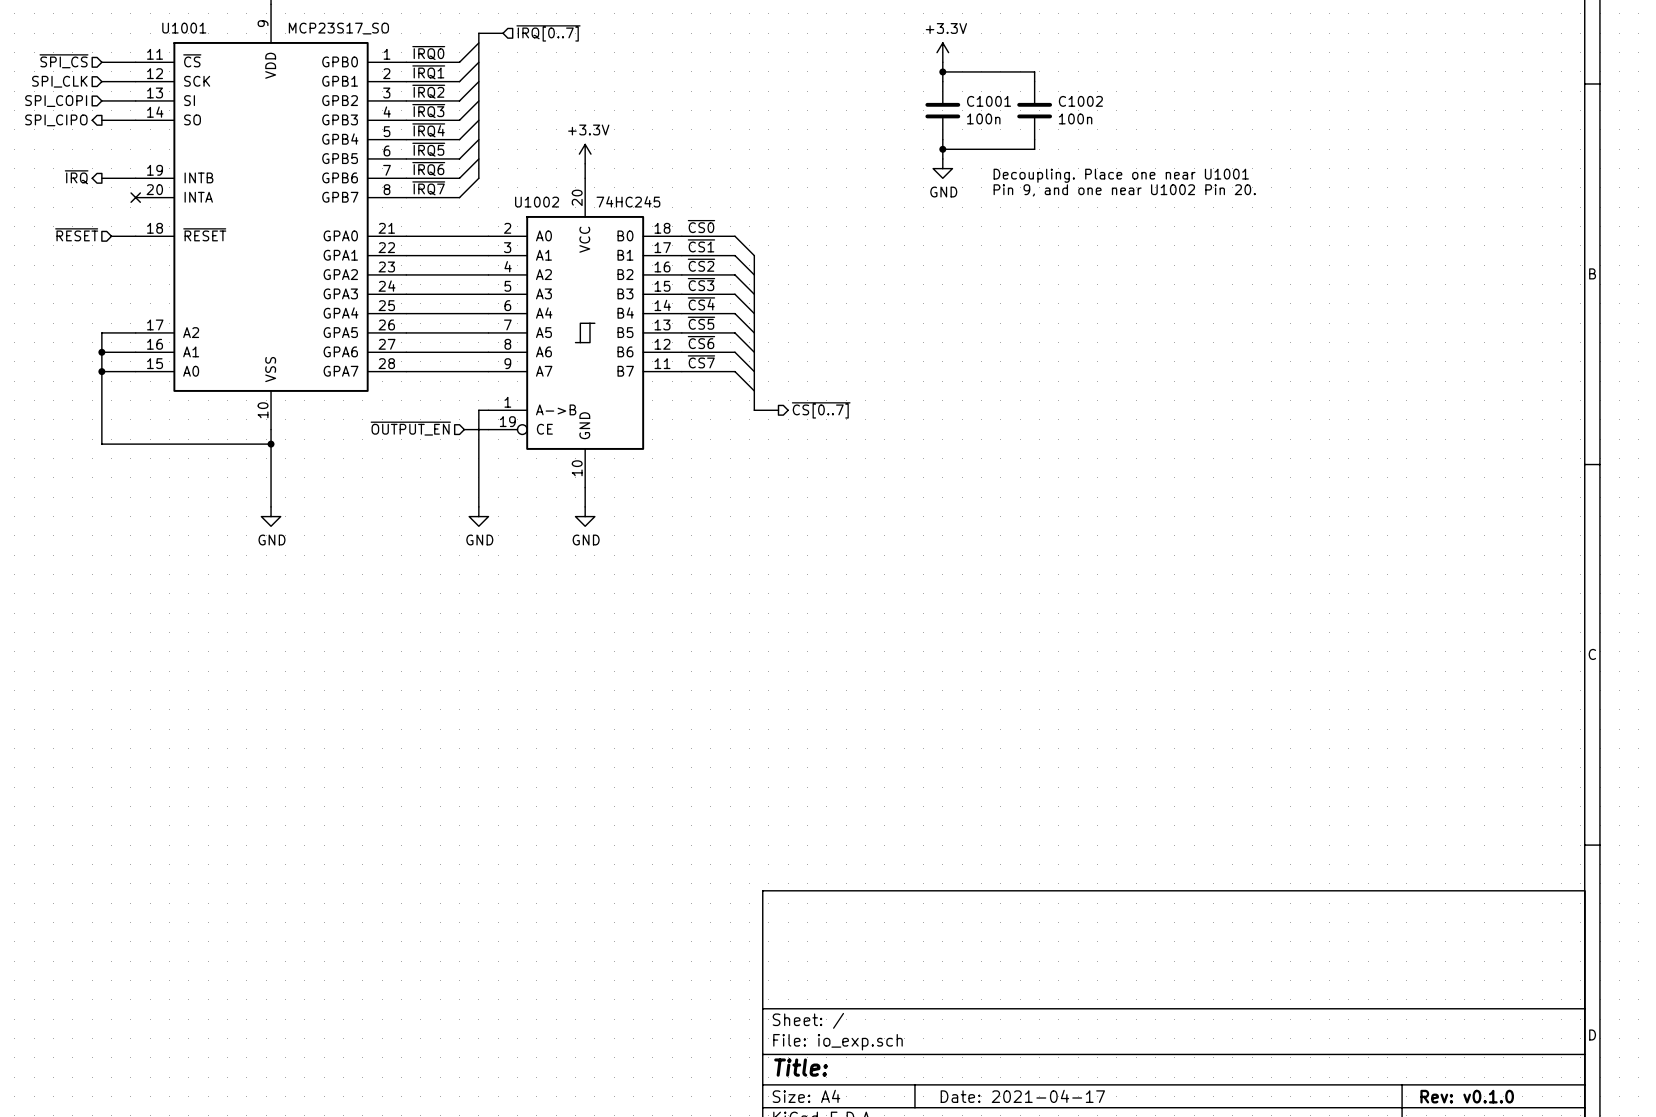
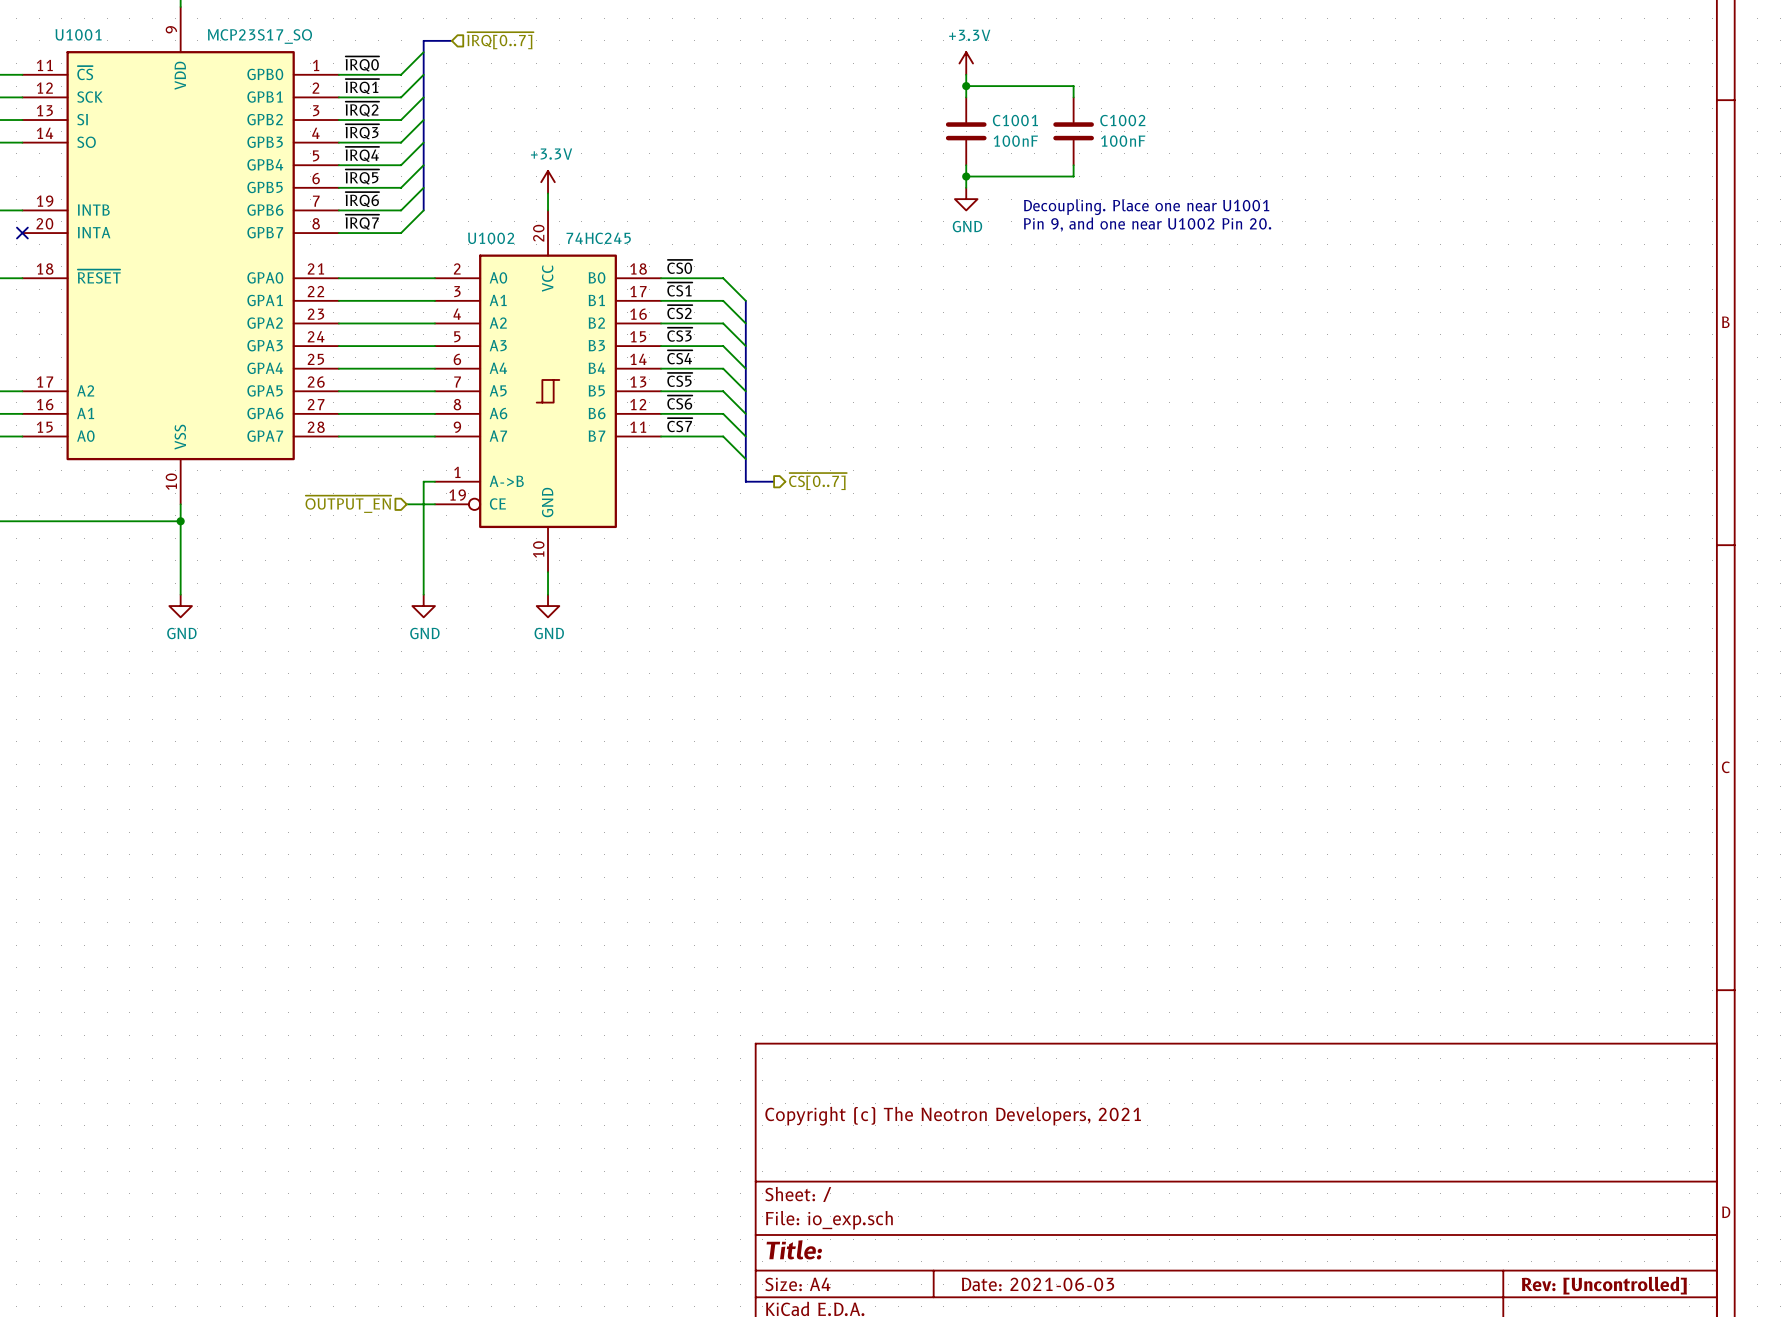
C1001 value: 100n (983, 118) -> 100nF (1015, 141)
C1002 value: 100n (1075, 118) -> 100nF (1123, 141)
title block: none -> Copyright (c) The Neotron Developers, 2021 (953, 1116)
title block: Date: 2021-04-17 (1022, 1096) -> Date: 2021-06-03 (1038, 1284)
title block: Rev: v0.1.0 (1467, 1096) -> Rev: [Uncontrolled] (1604, 1285)

